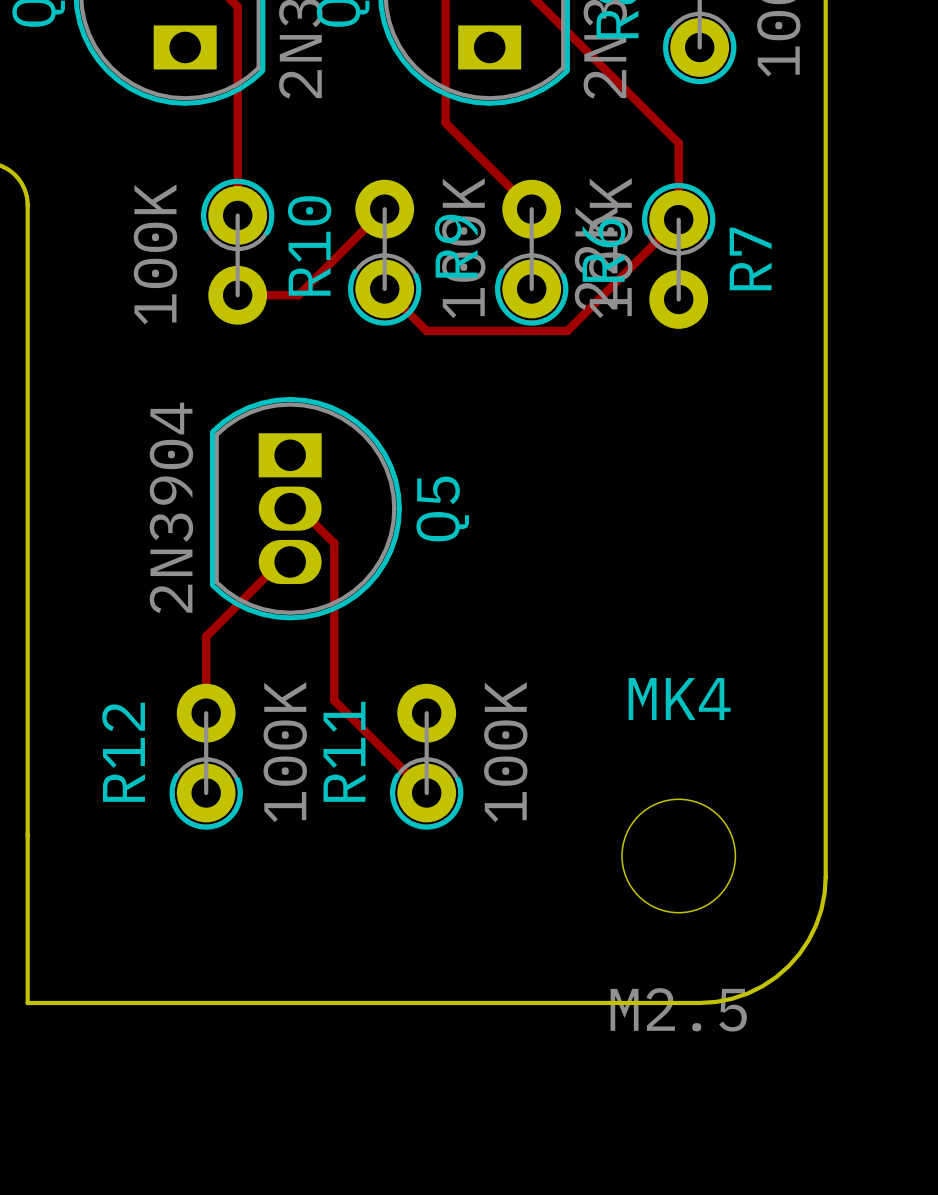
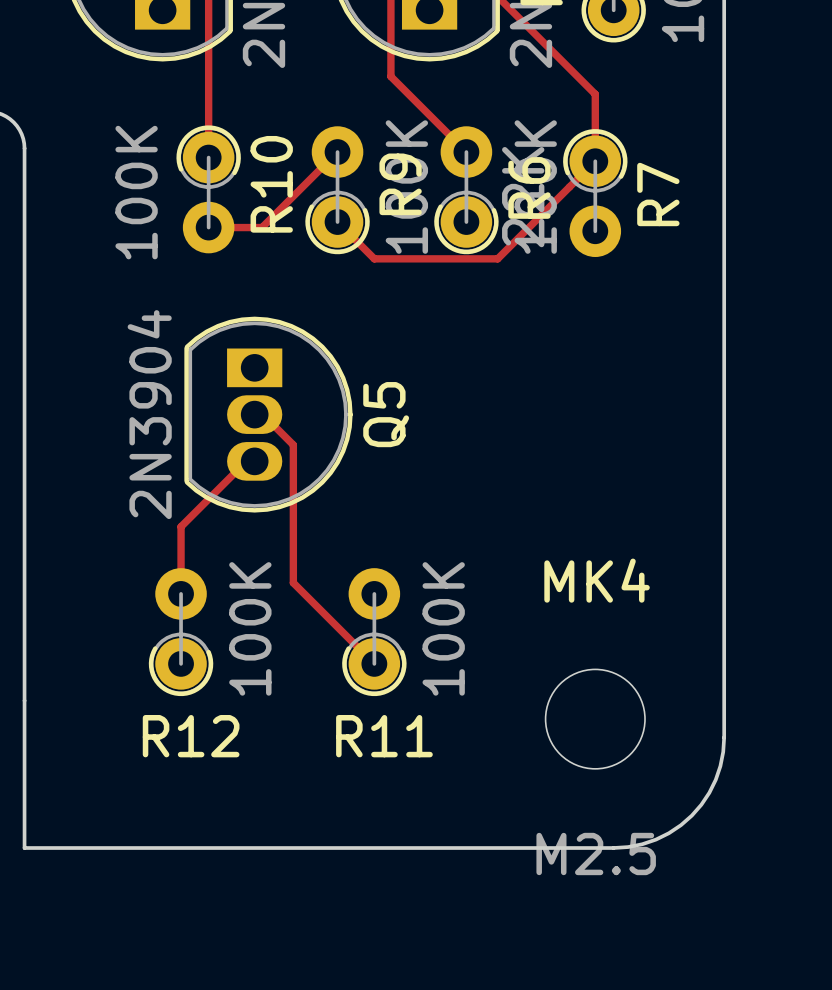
R11 name rotation: 0° (344, 751) -> 90° clockwise (384, 736)
R11 name position: R11 (344, 751) -> R11 (384, 736)
R12 name rotation: 0° (123, 752) -> 90° clockwise (191, 736)
R12 name position: R12 (123, 752) -> R12 (191, 736)

